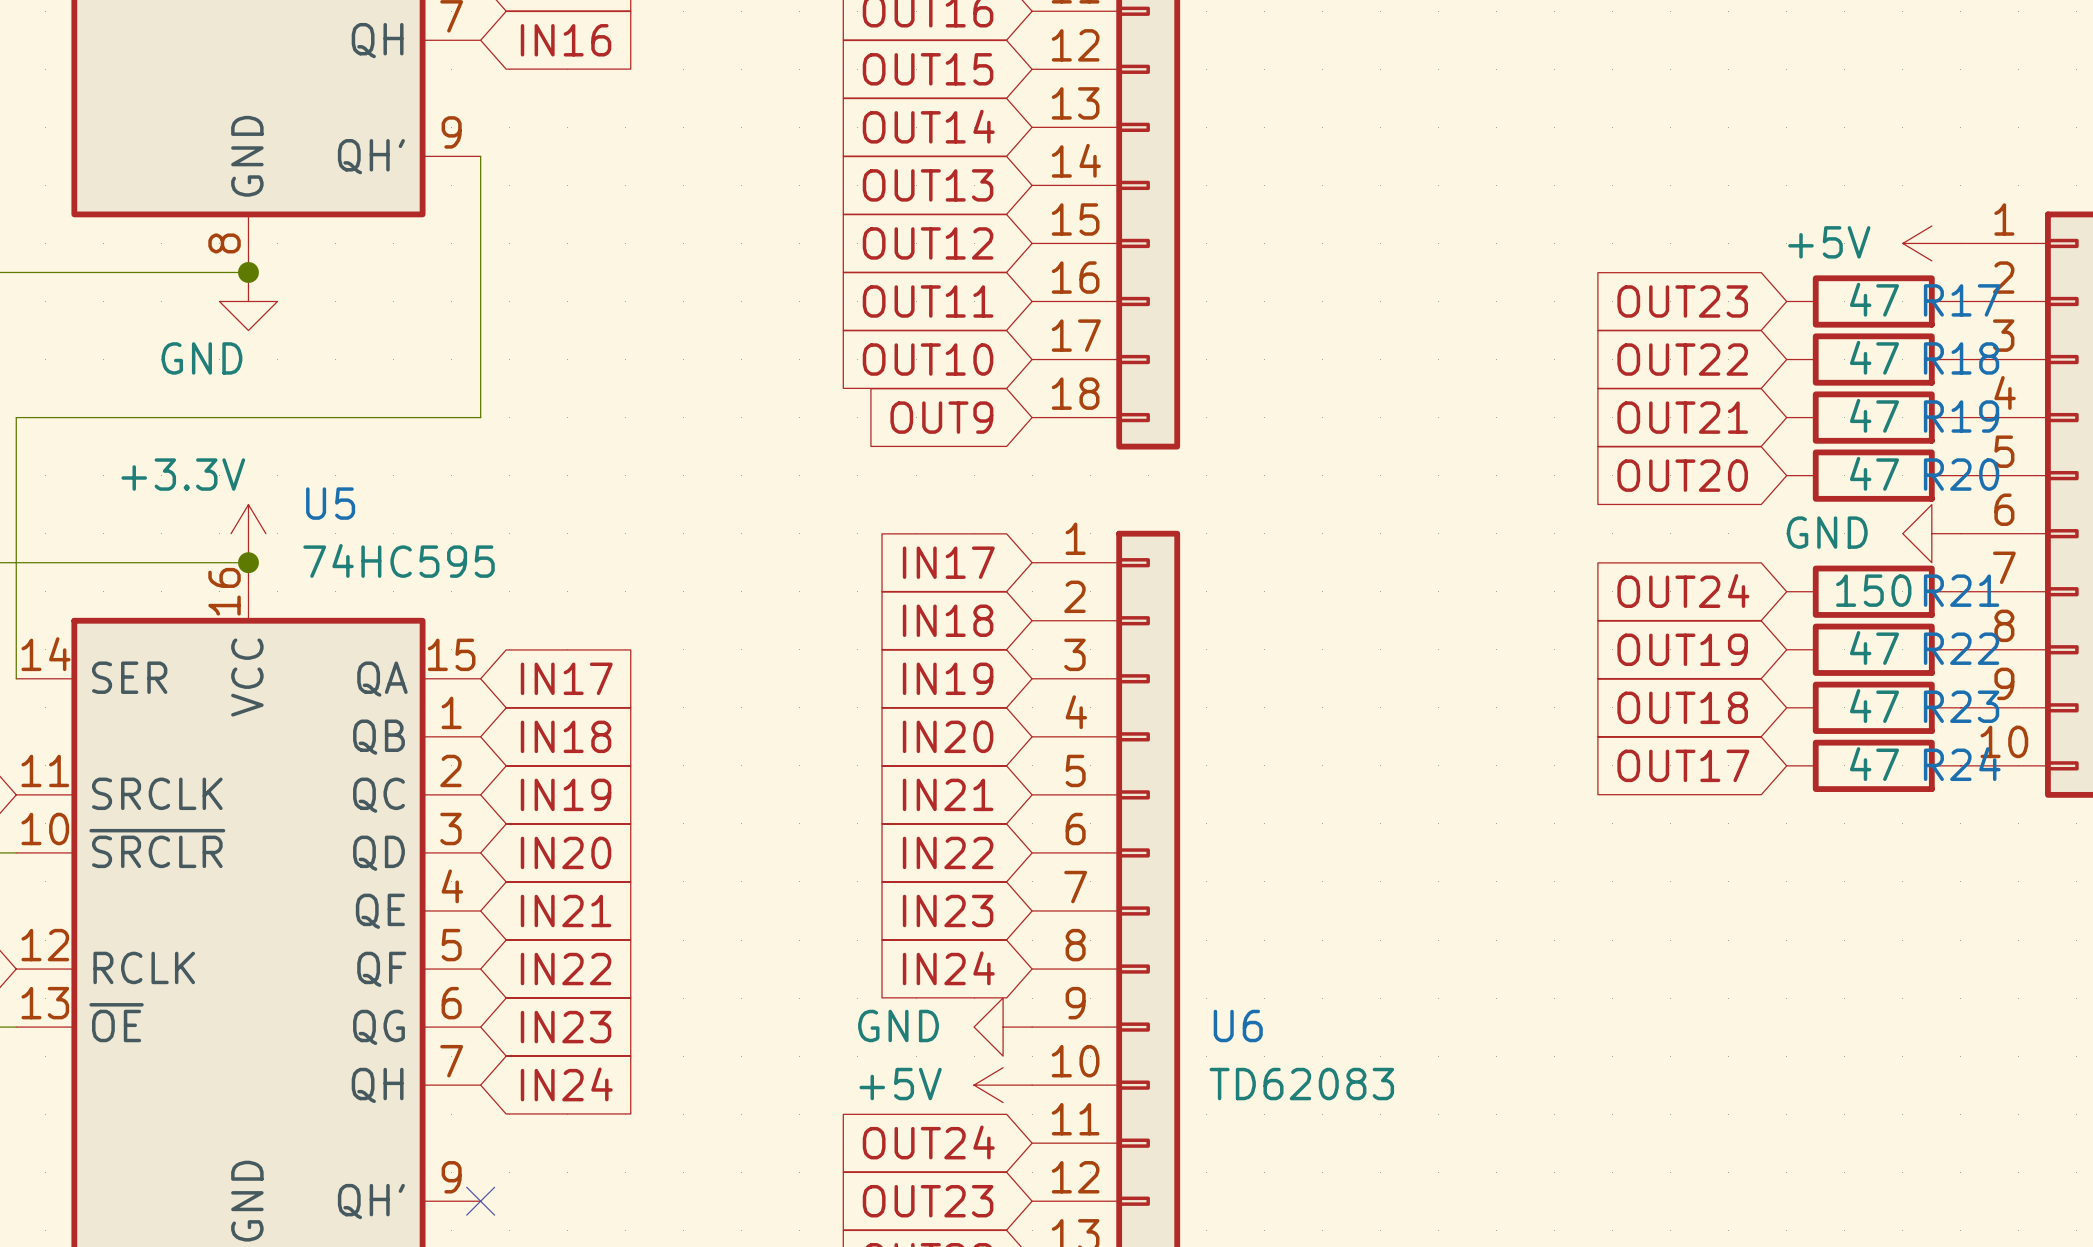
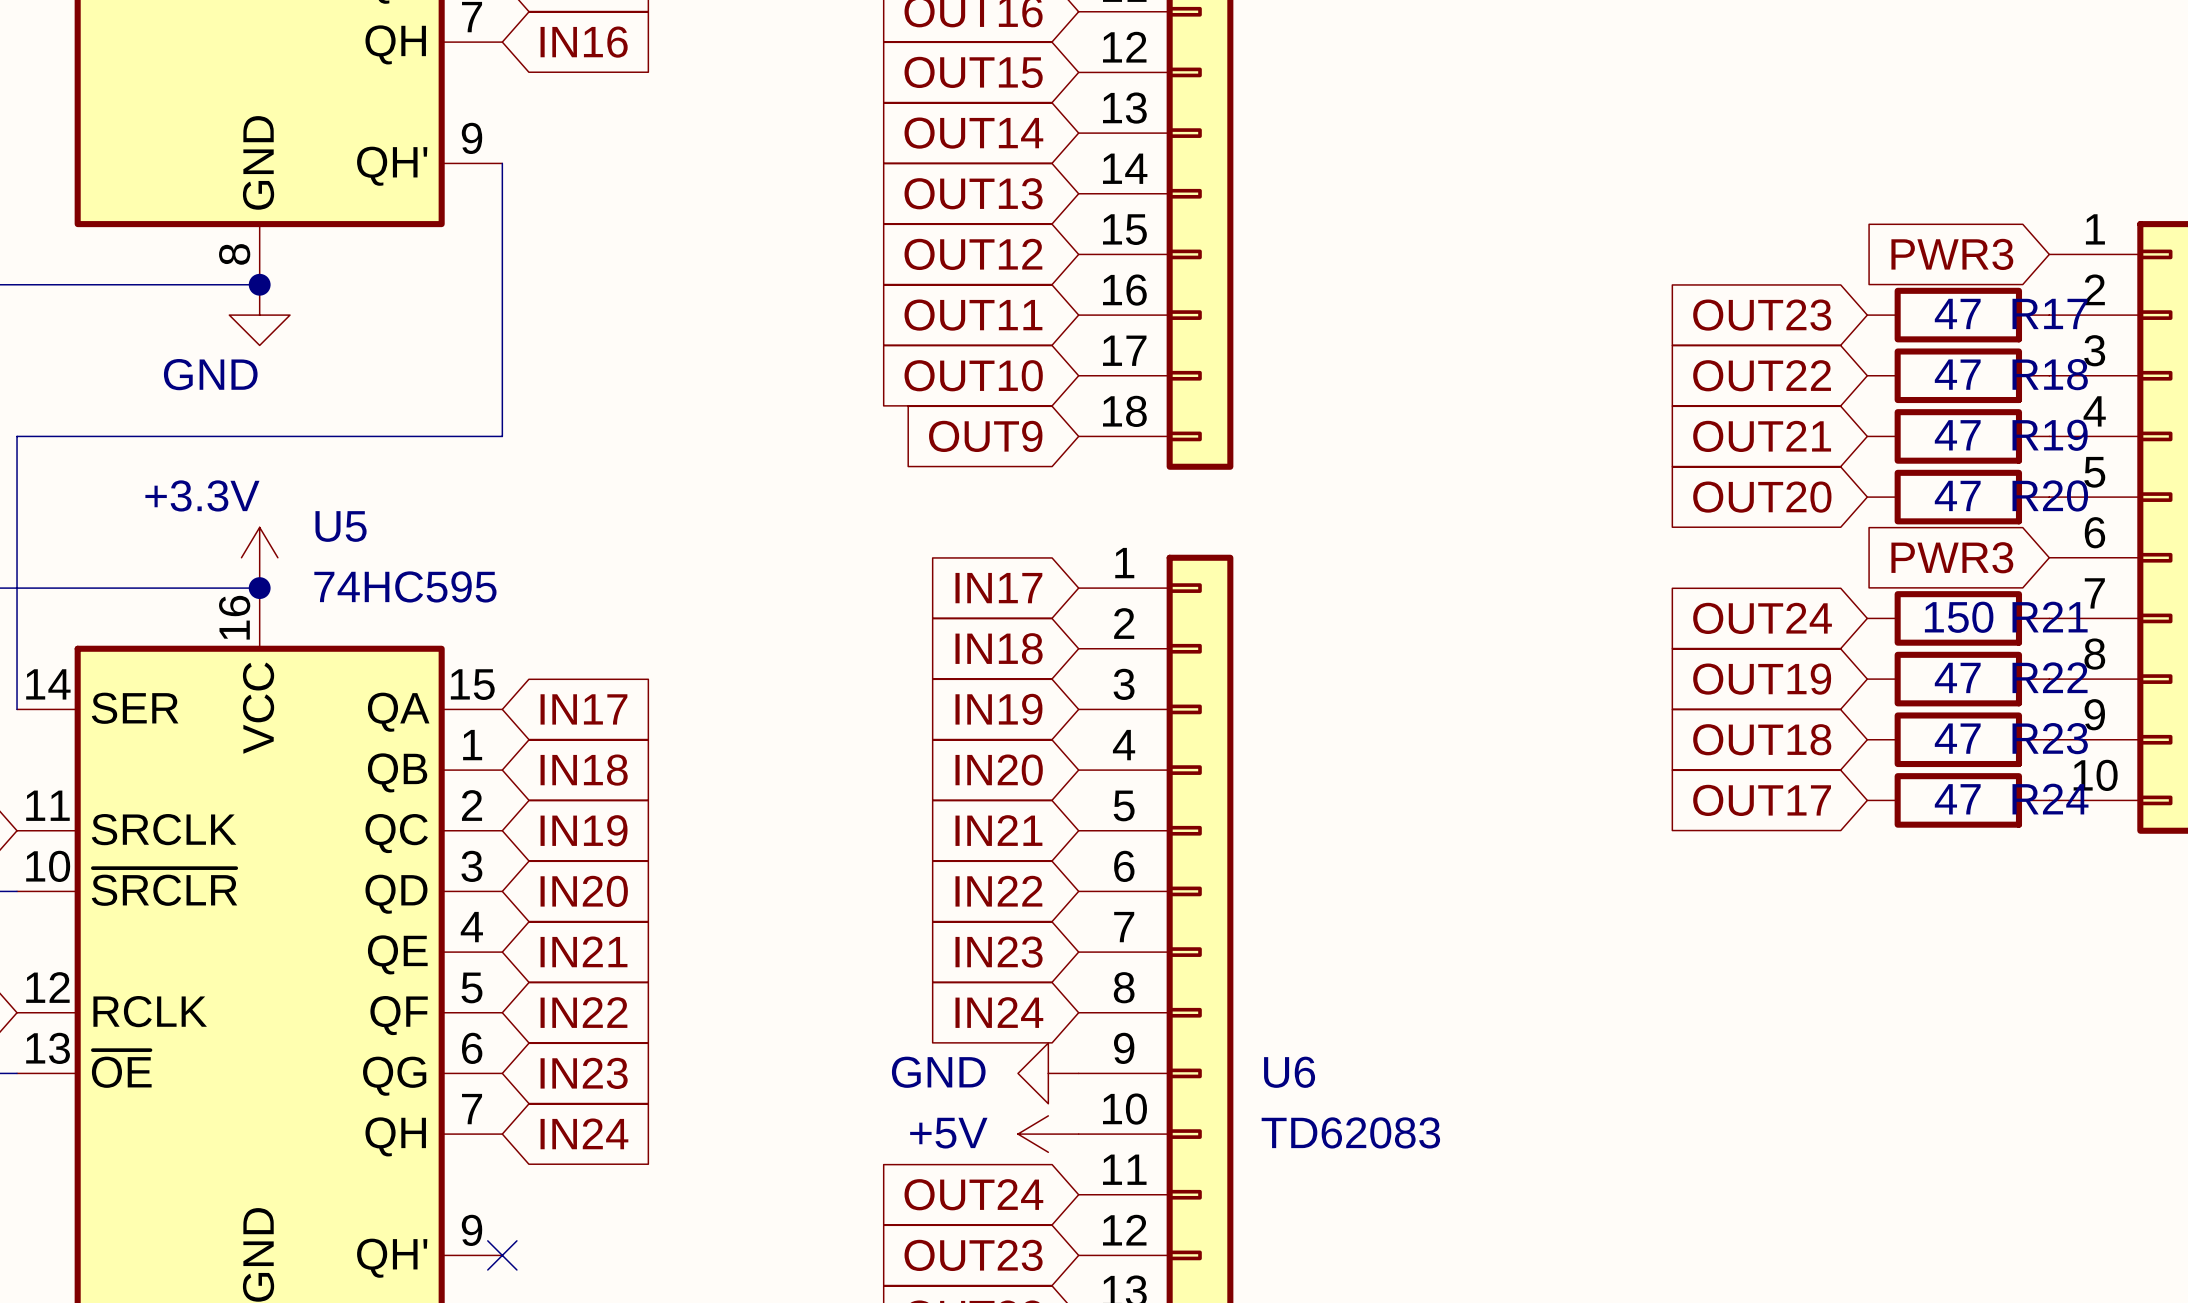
global label: none -> PWR3 (1952, 254)
power symbol: +5V (1931, 243) -> none
global label: none -> PWR3 (1952, 557)
power symbol: GND (1931, 533) -> none

